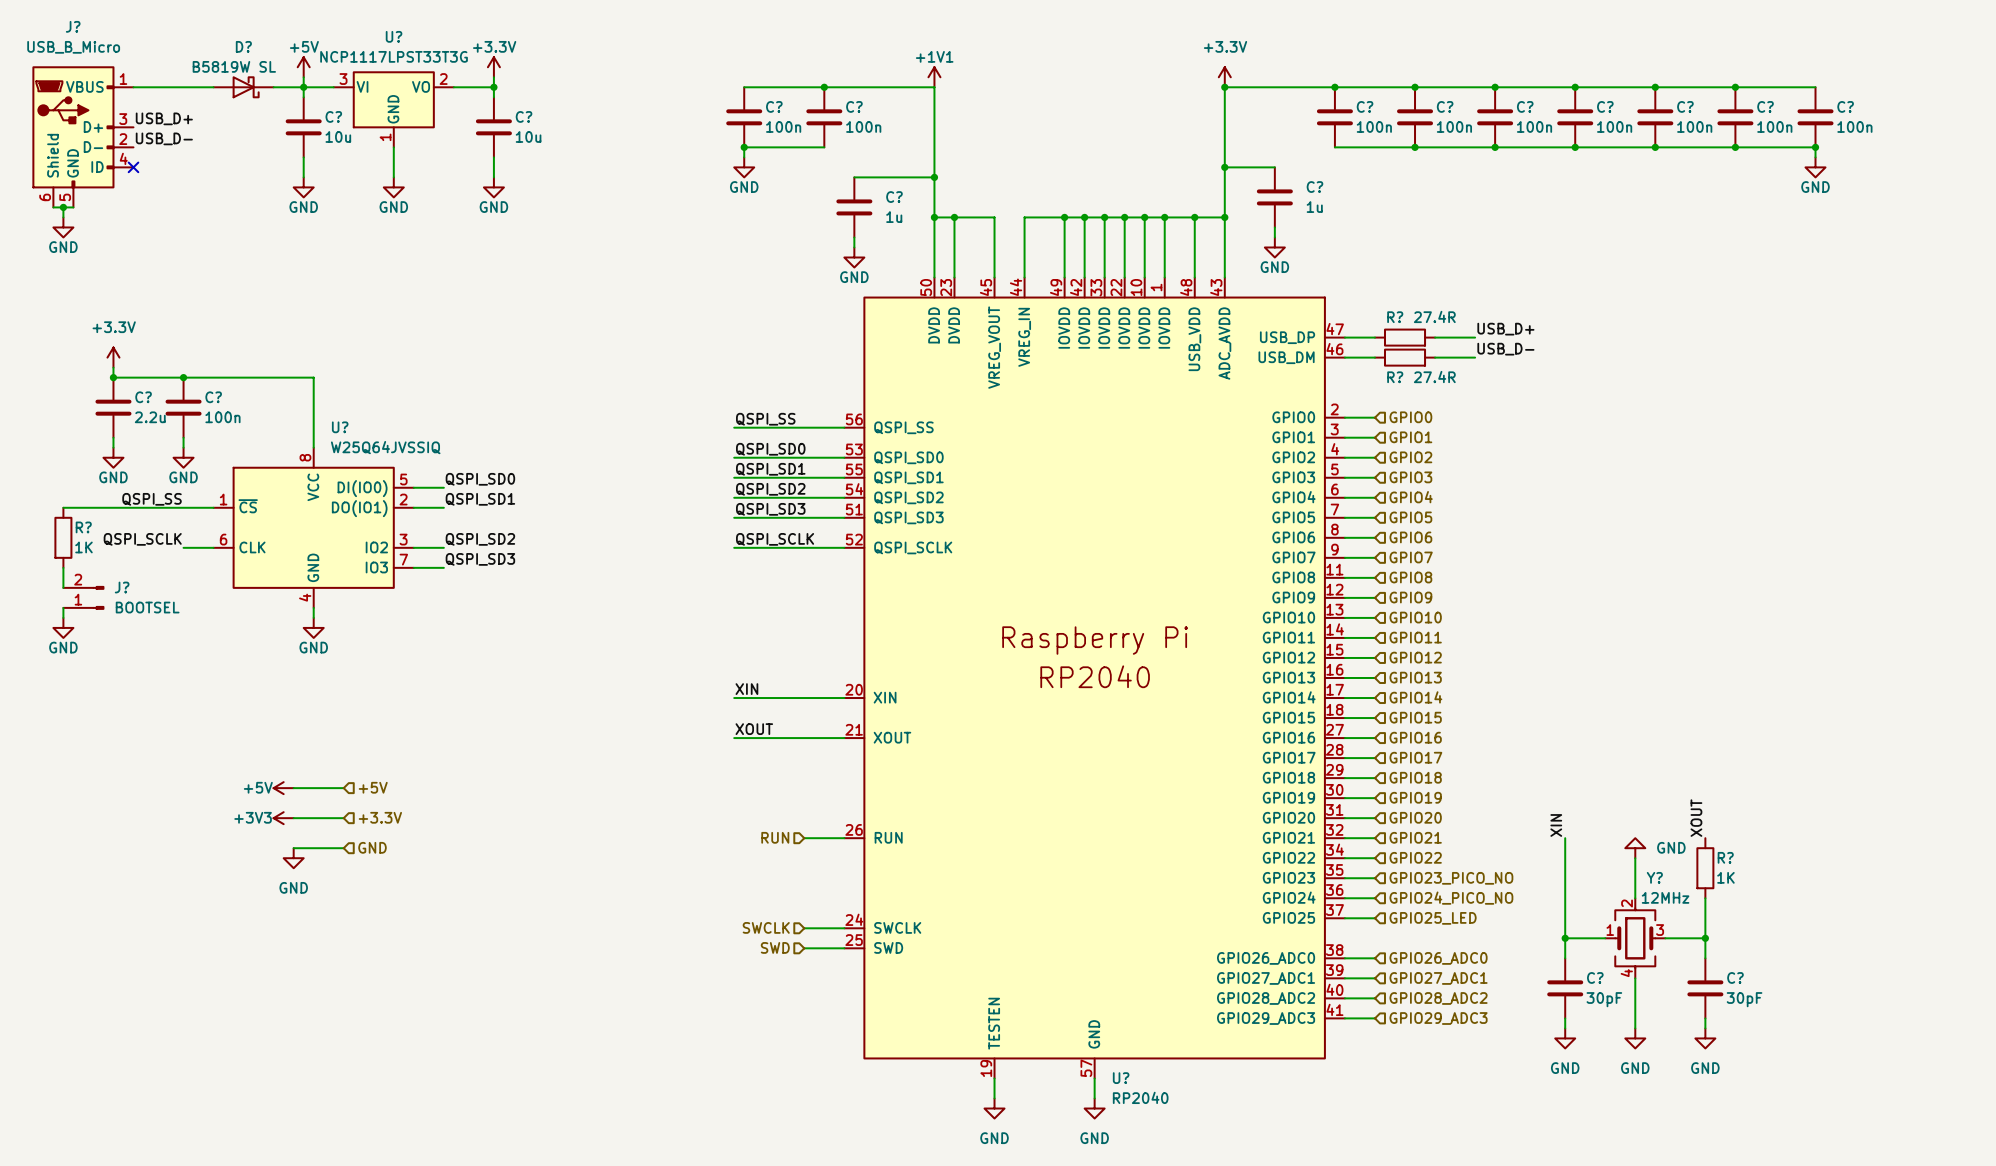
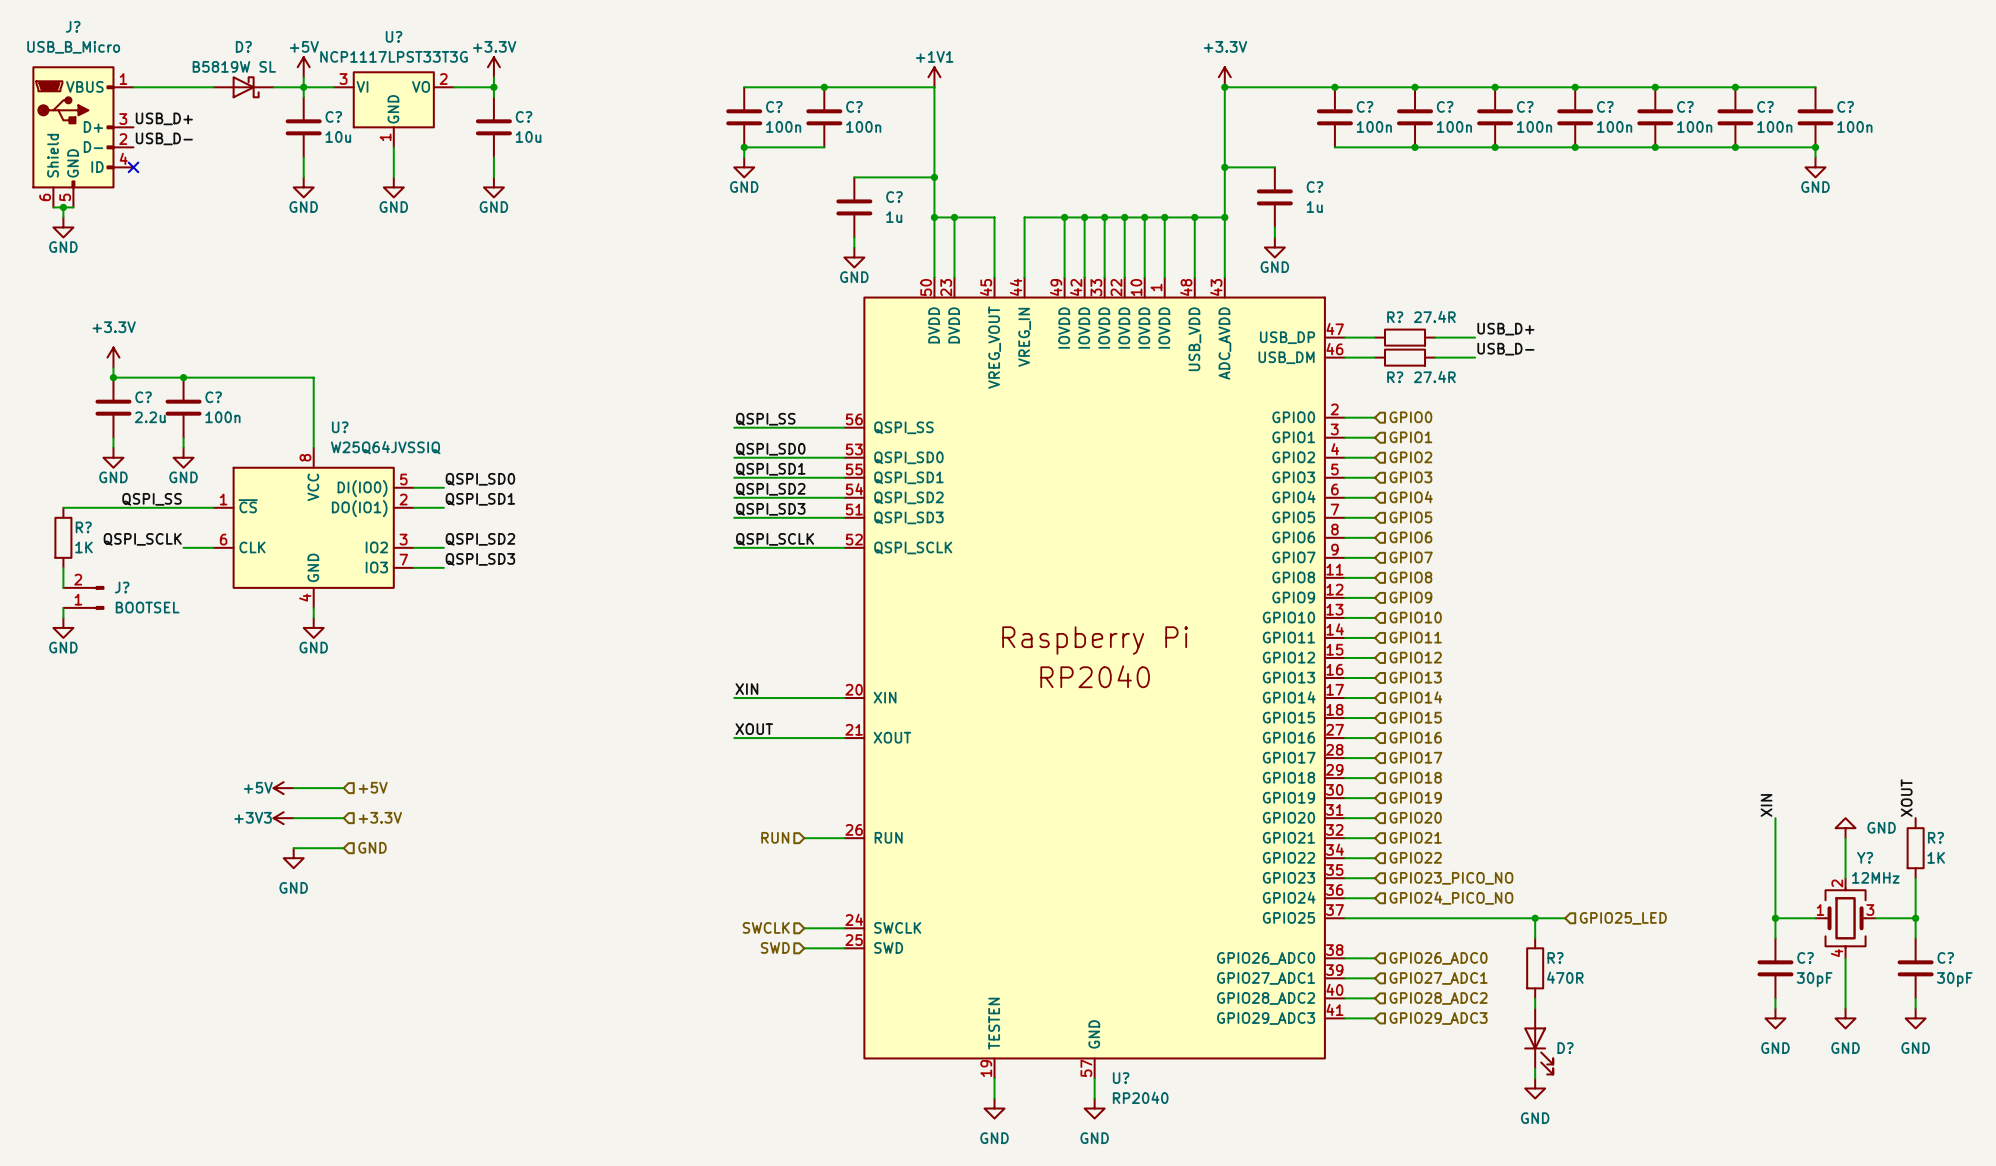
label: none -> XOUT (1906, 798)
label: none -> XIN (1766, 805)
label: XOUT (1696, 818) -> none
wire: none -> (1775, 818) (1775, 938)
label: XIN (1556, 825) -> none
power symbol: none -> GND (1845, 828)
wire: (1565, 838) (1565, 958) -> none
wire: none -> (1845, 838) (1845, 878)
power symbol: GND (1635, 848) -> none
R?: none -> 1K (1915, 848)
wire: (1635, 858) (1635, 898) -> none
R?: 1K (1705, 868) -> none
wire: none -> (1915, 878) (1915, 938)
wire: (1705, 898) (1705, 958) -> none
wire: none -> (1374, 918) (1565, 918)
hierarchical label position: GPIO25_LED (1433, 918) -> GPIO25_LED (1623, 918)
wire: none -> (1535, 918) (1535, 938)
junction: none -> (1775, 918)
Y?: none -> 12MHz (1845, 918)
wire: none -> (1875, 918) (1915, 918)
junction: none -> (1915, 918)
wire: (1565, 938) (1605, 938) -> none
junction position: (1565, 938) -> (1535, 918)
Y?: 12MHz (1635, 938) -> none
wire: (1665, 938) (1705, 938) -> (1775, 918) (1815, 918)
junction: (1705, 938) -> none
wire: none -> (1845, 958) (1845, 1008)
R?: none -> 470R (1535, 968)
C?: none -> 30pF (1915, 968)
wire: (1635, 978) (1635, 1028) -> none
C?: 30pF (1565, 988) -> none
C? position: (1705, 988) -> (1775, 968)
wire: none -> (1915, 998) (1915, 1008)
wire: (1565, 1018) (1565, 1028) -> (1535, 998) (1535, 1008)
wire: (1705, 1018) (1705, 1028) -> (1775, 998) (1775, 1008)
power symbol: none -> GND (1775, 1018)
power symbol: none -> GND (1845, 1018)
power symbol: none -> GND (1915, 1018)
power symbol: GND (1565, 1038) -> none
power symbol: GND (1635, 1038) -> none
power symbol: GND (1705, 1038) -> none
D?: none -> (1538, 1041)
wire: none -> (1535, 1068) (1535, 1078)
power symbol: none -> GND (1535, 1088)

